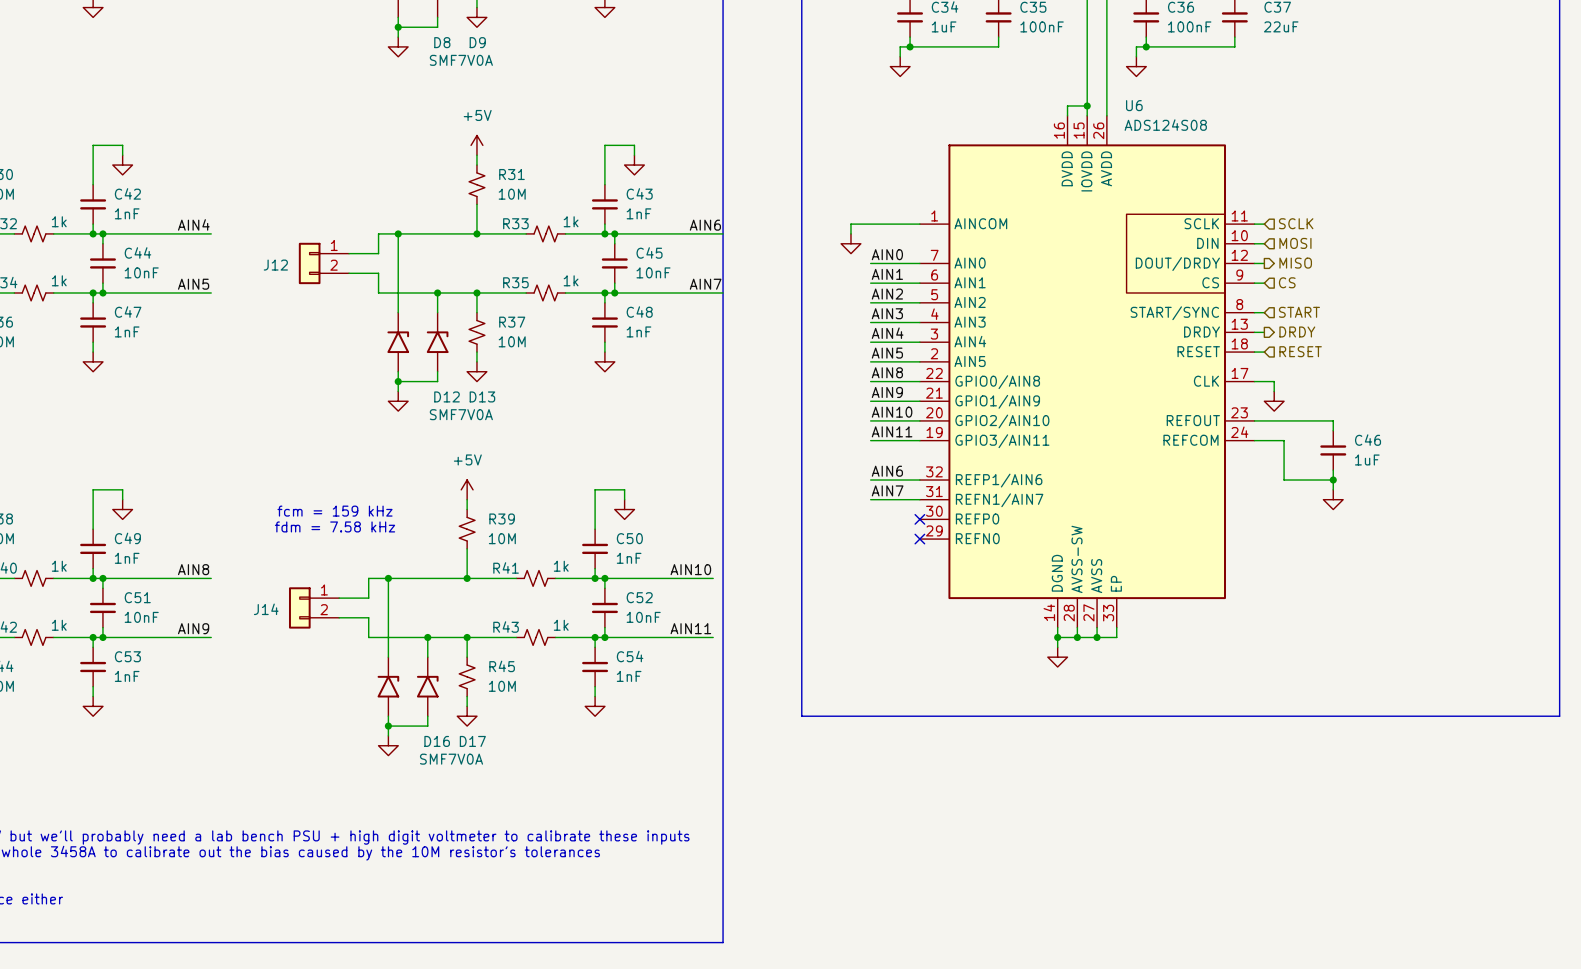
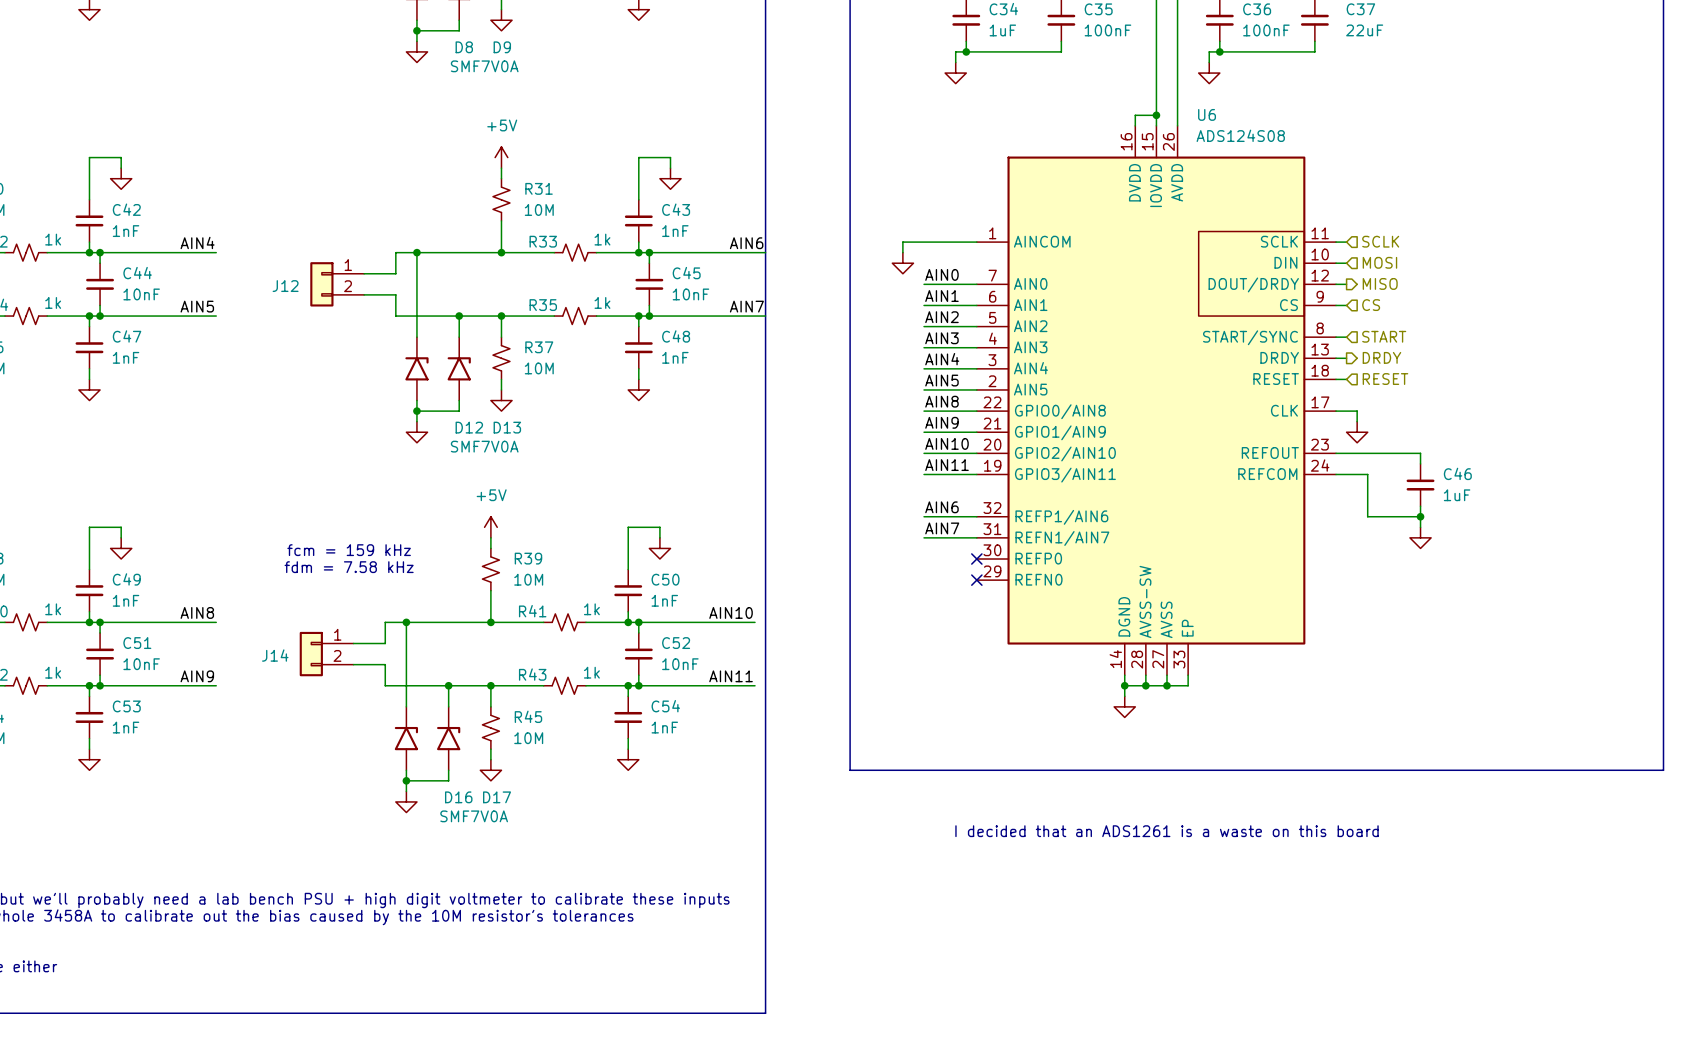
text: none -> I decided that an ADS1261 is a waste on this board (1166, 831)

